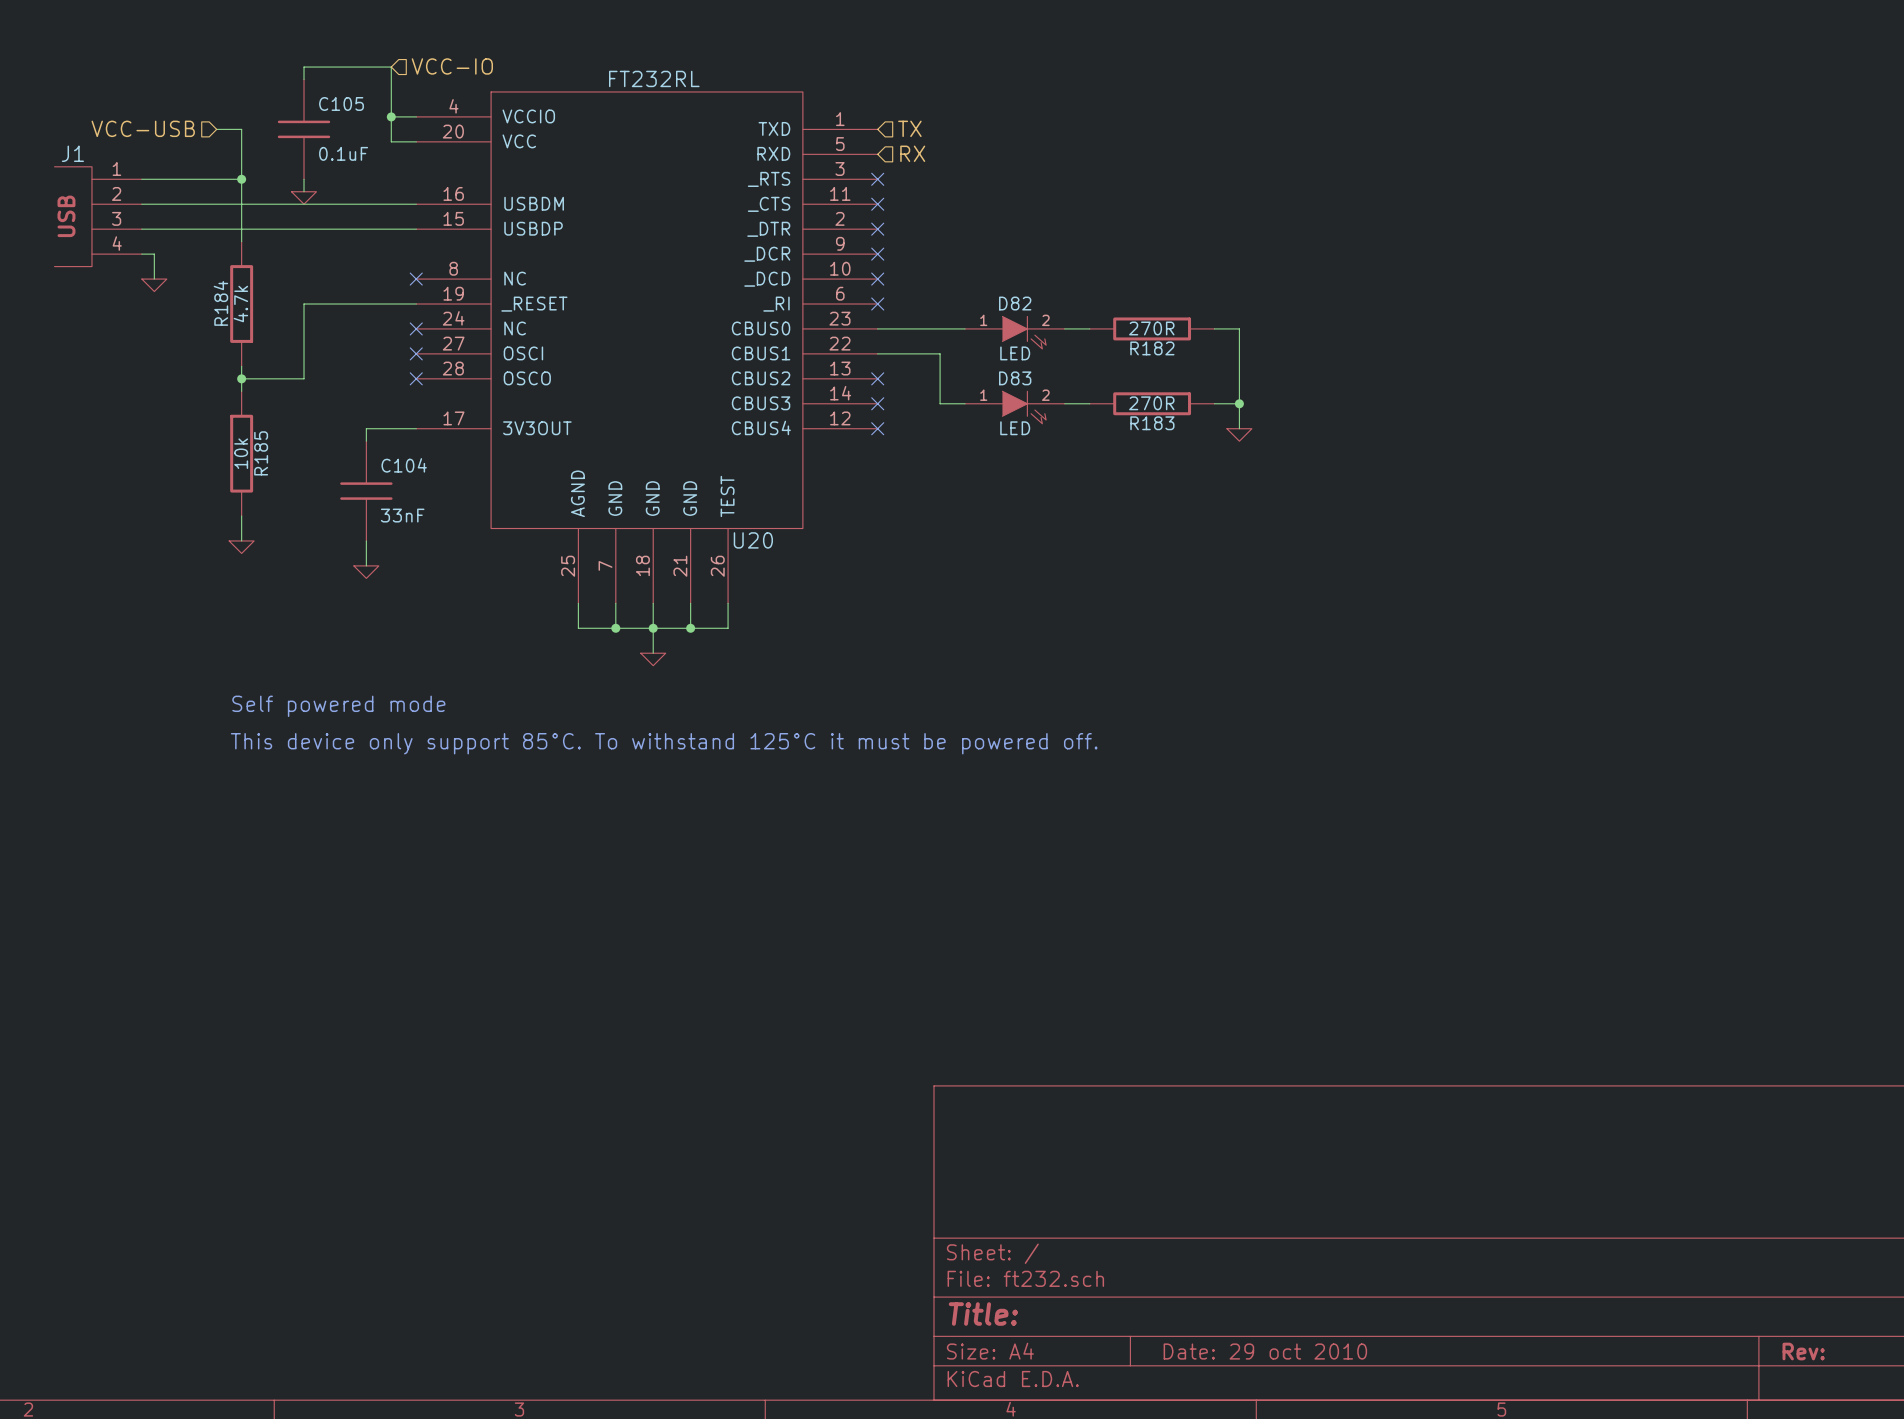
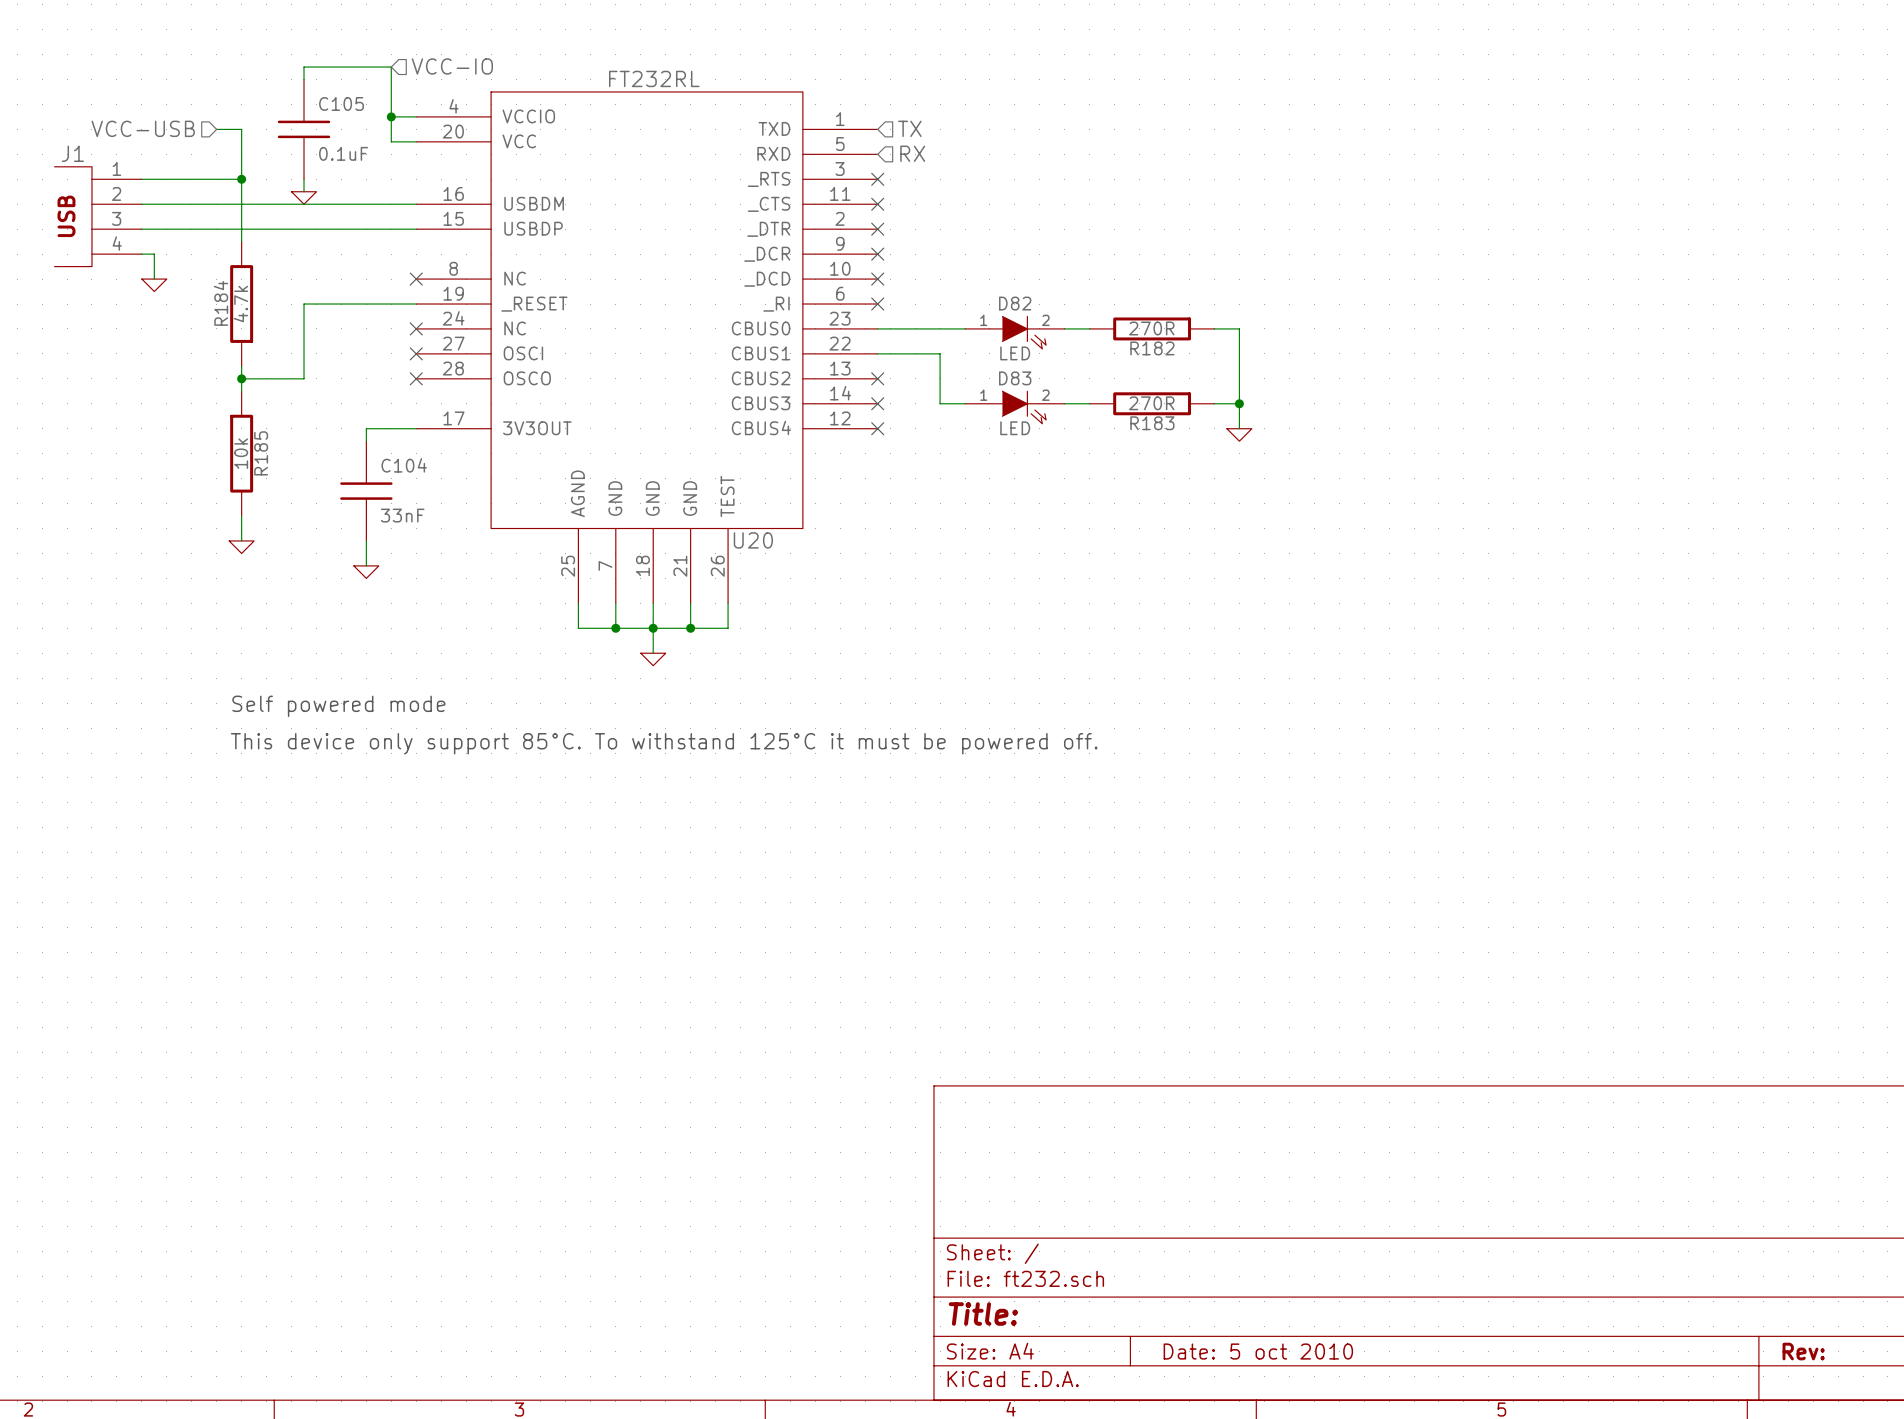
title block: Date: 29 oct 2010 (1265, 1351) -> Date: 5 oct 2010 (1258, 1351)

